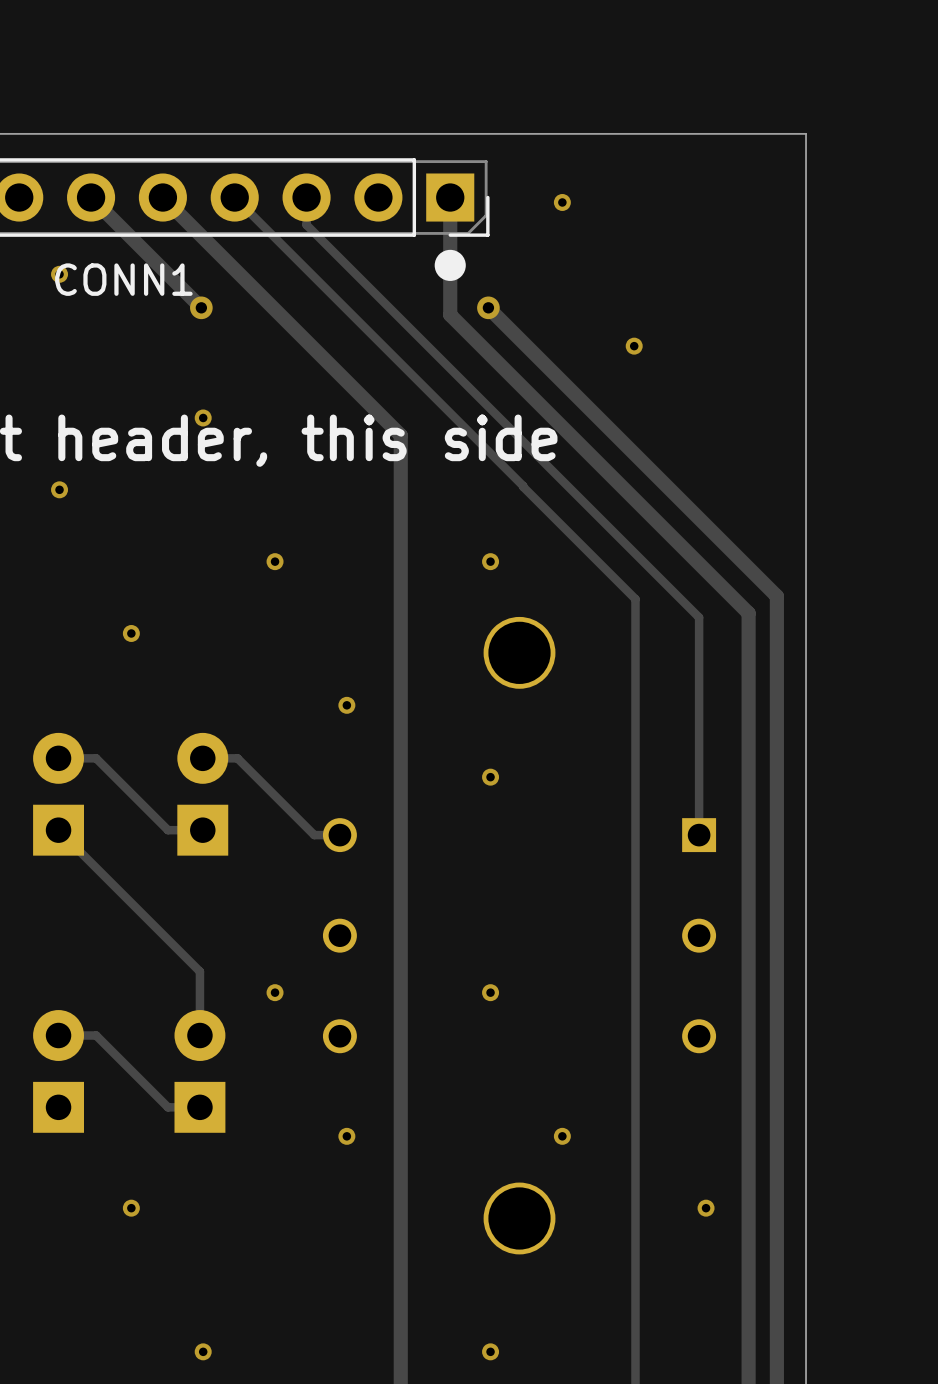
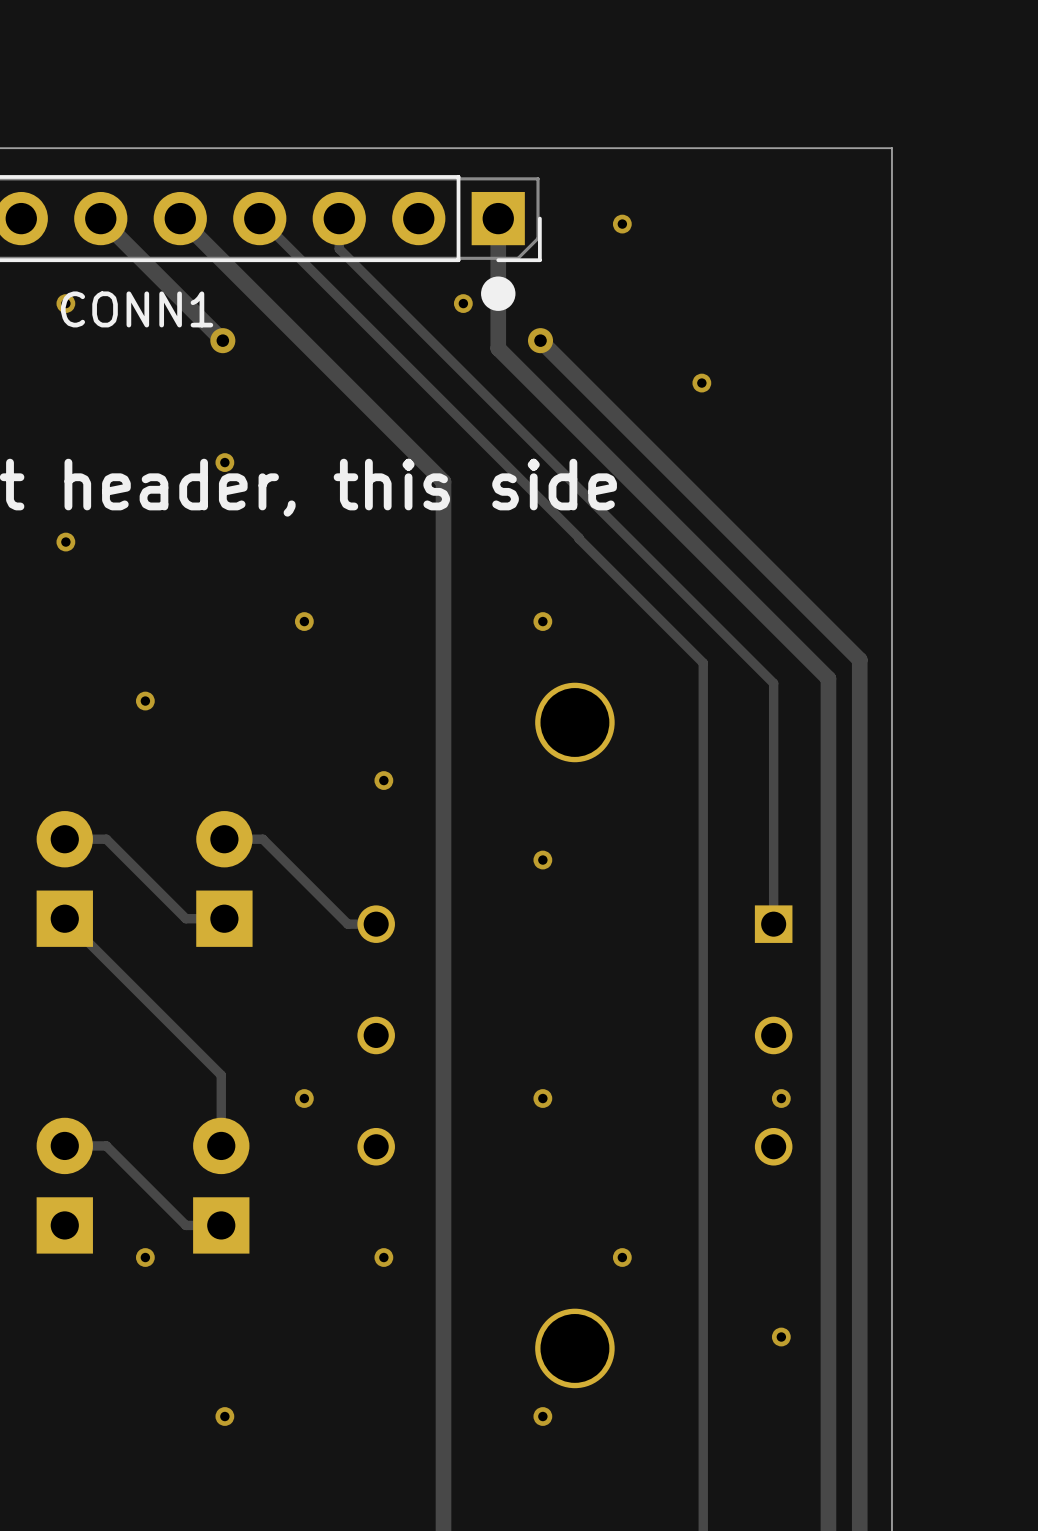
via: none -> (463, 303)
via: none -> (781, 1098)
via: none -> (145, 1257)
via: (131, 1208) -> none
via: none -> (224, 1416)
via: (203, 1351) -> none
via position: (490, 1351) -> (542, 1416)

